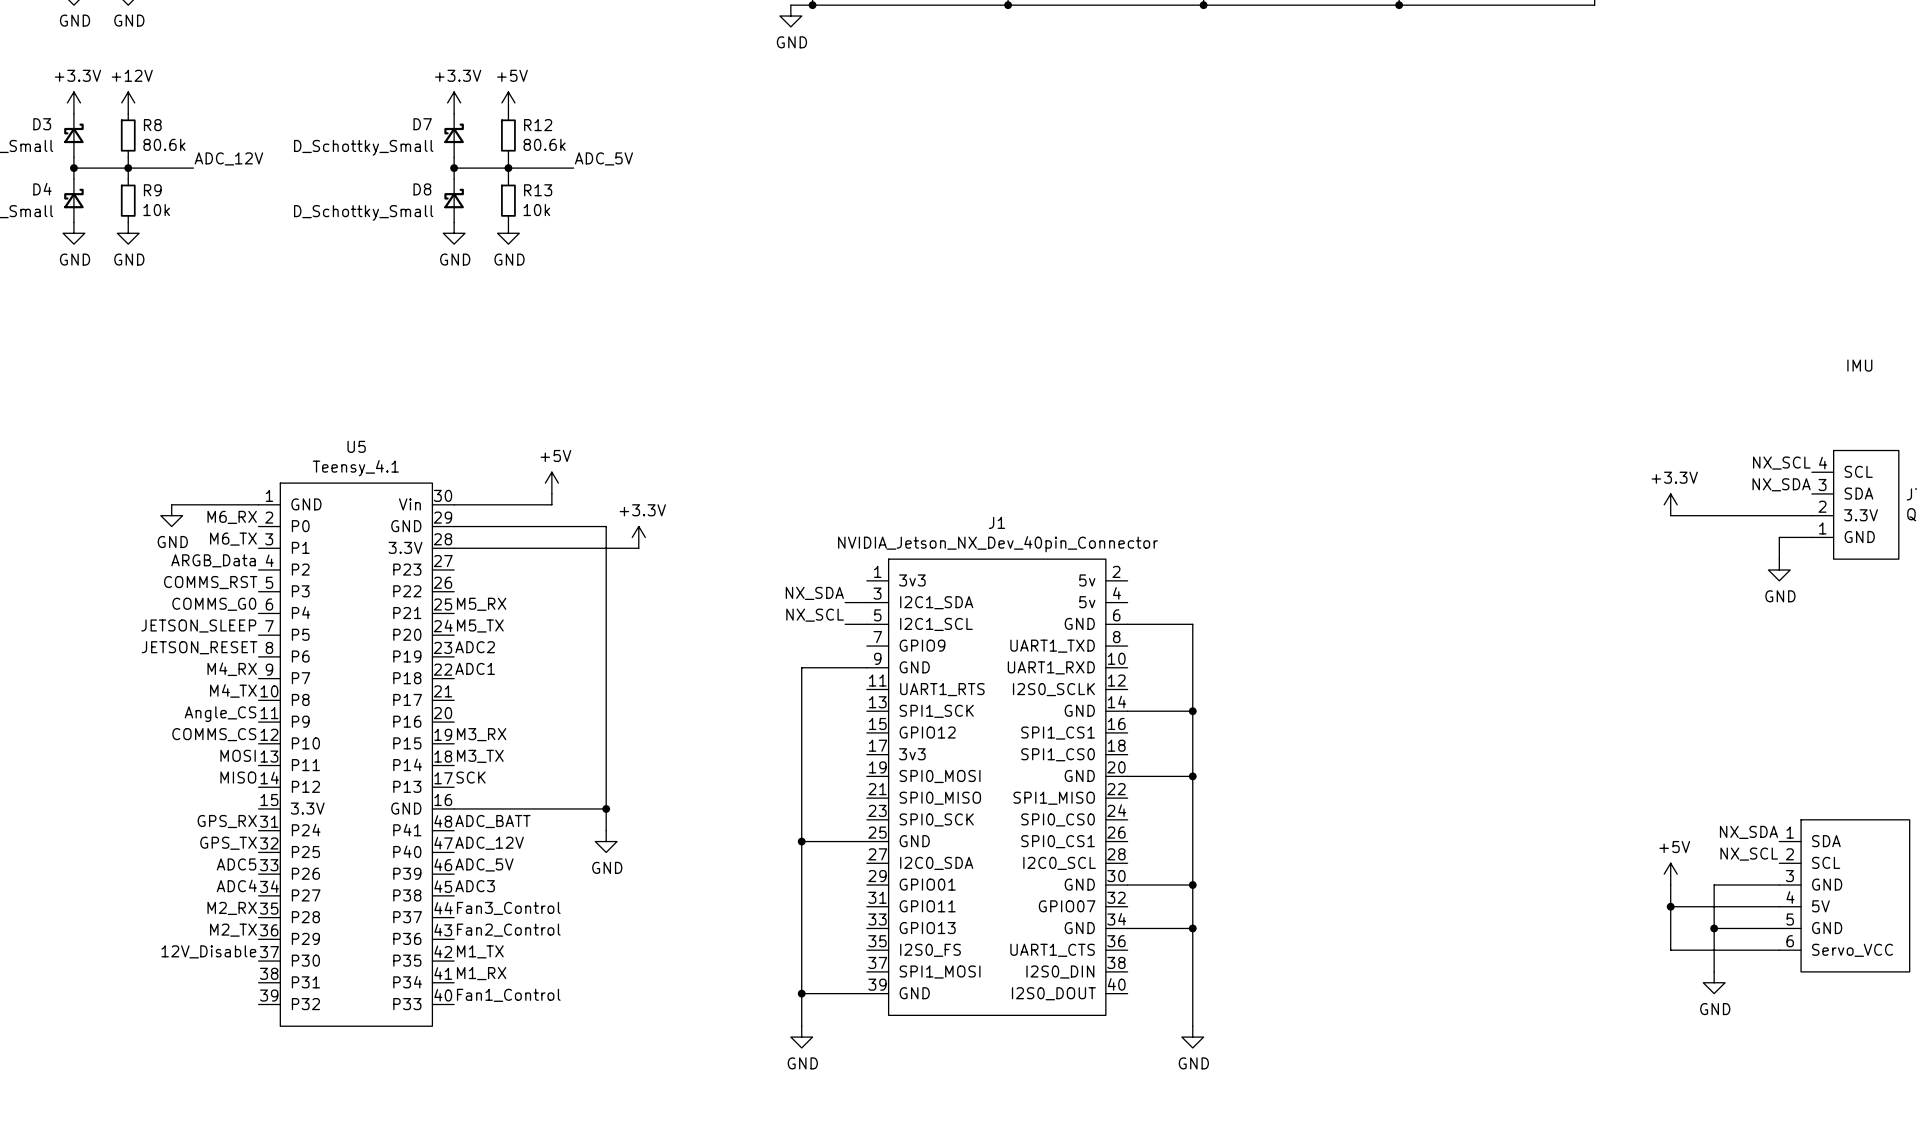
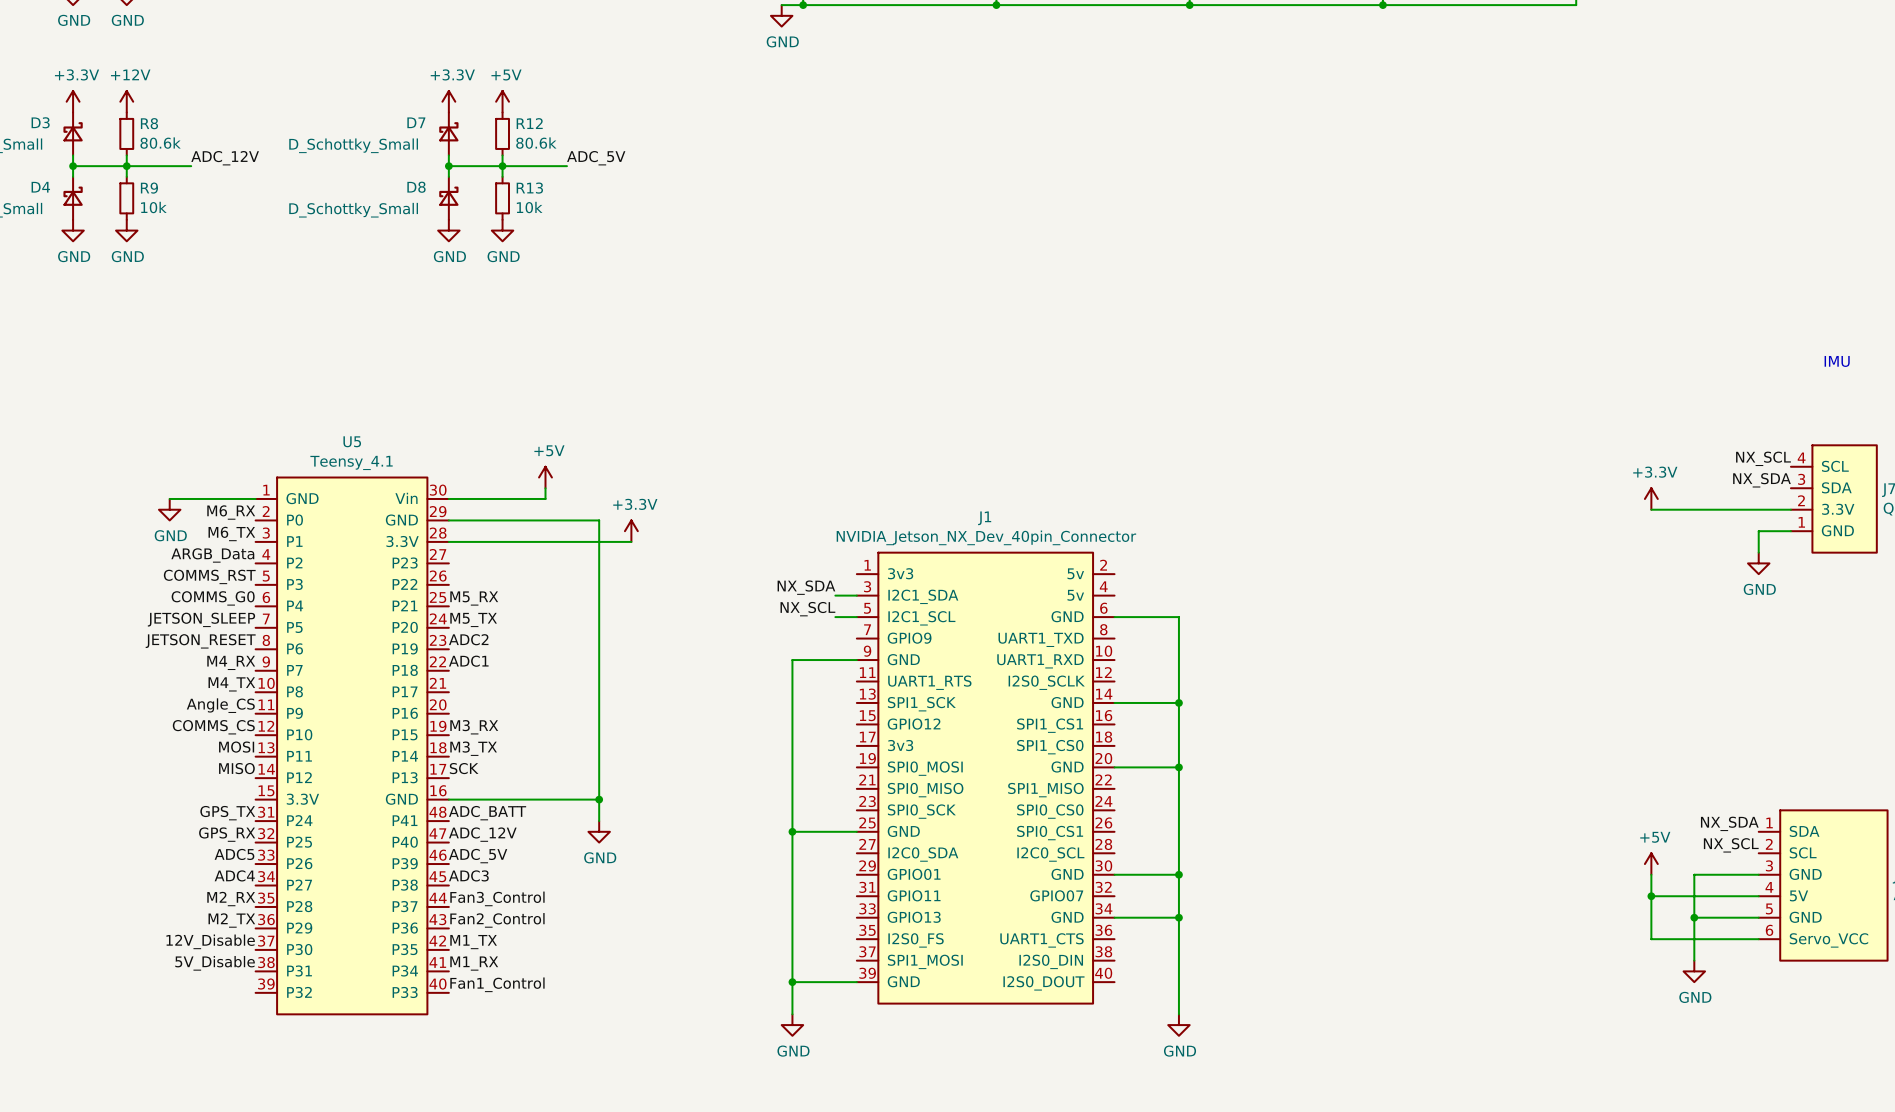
label: GPS_RX (227, 821) -> GPS_TX (227, 813)
label: GPS_TX (228, 843) -> GPS_RX (227, 834)
label: none -> 5V_Disable (215, 963)

